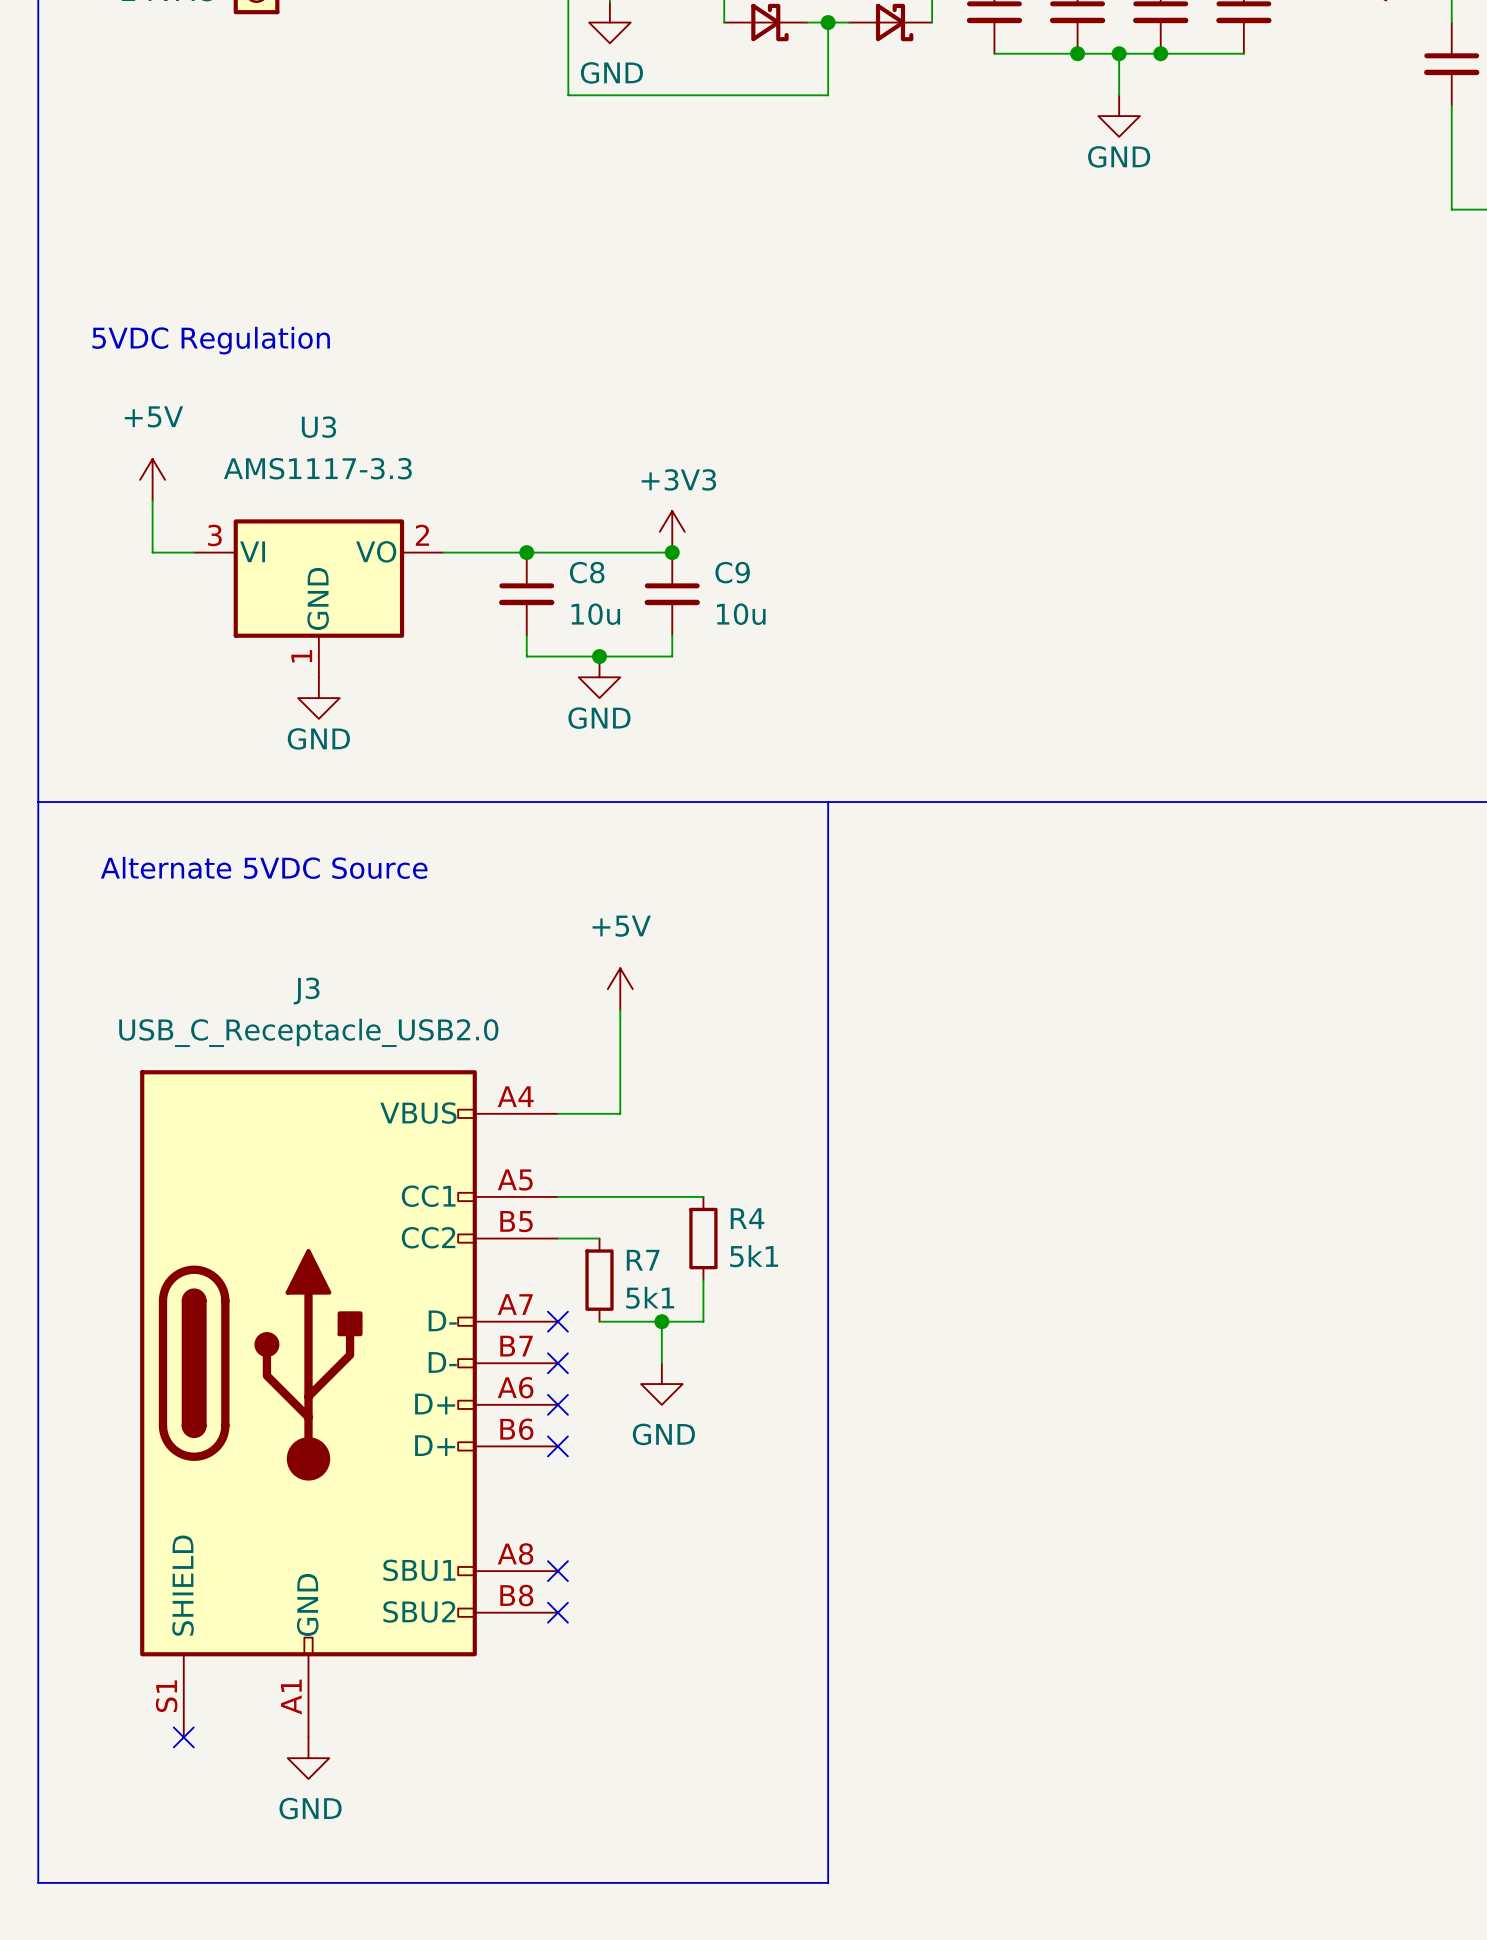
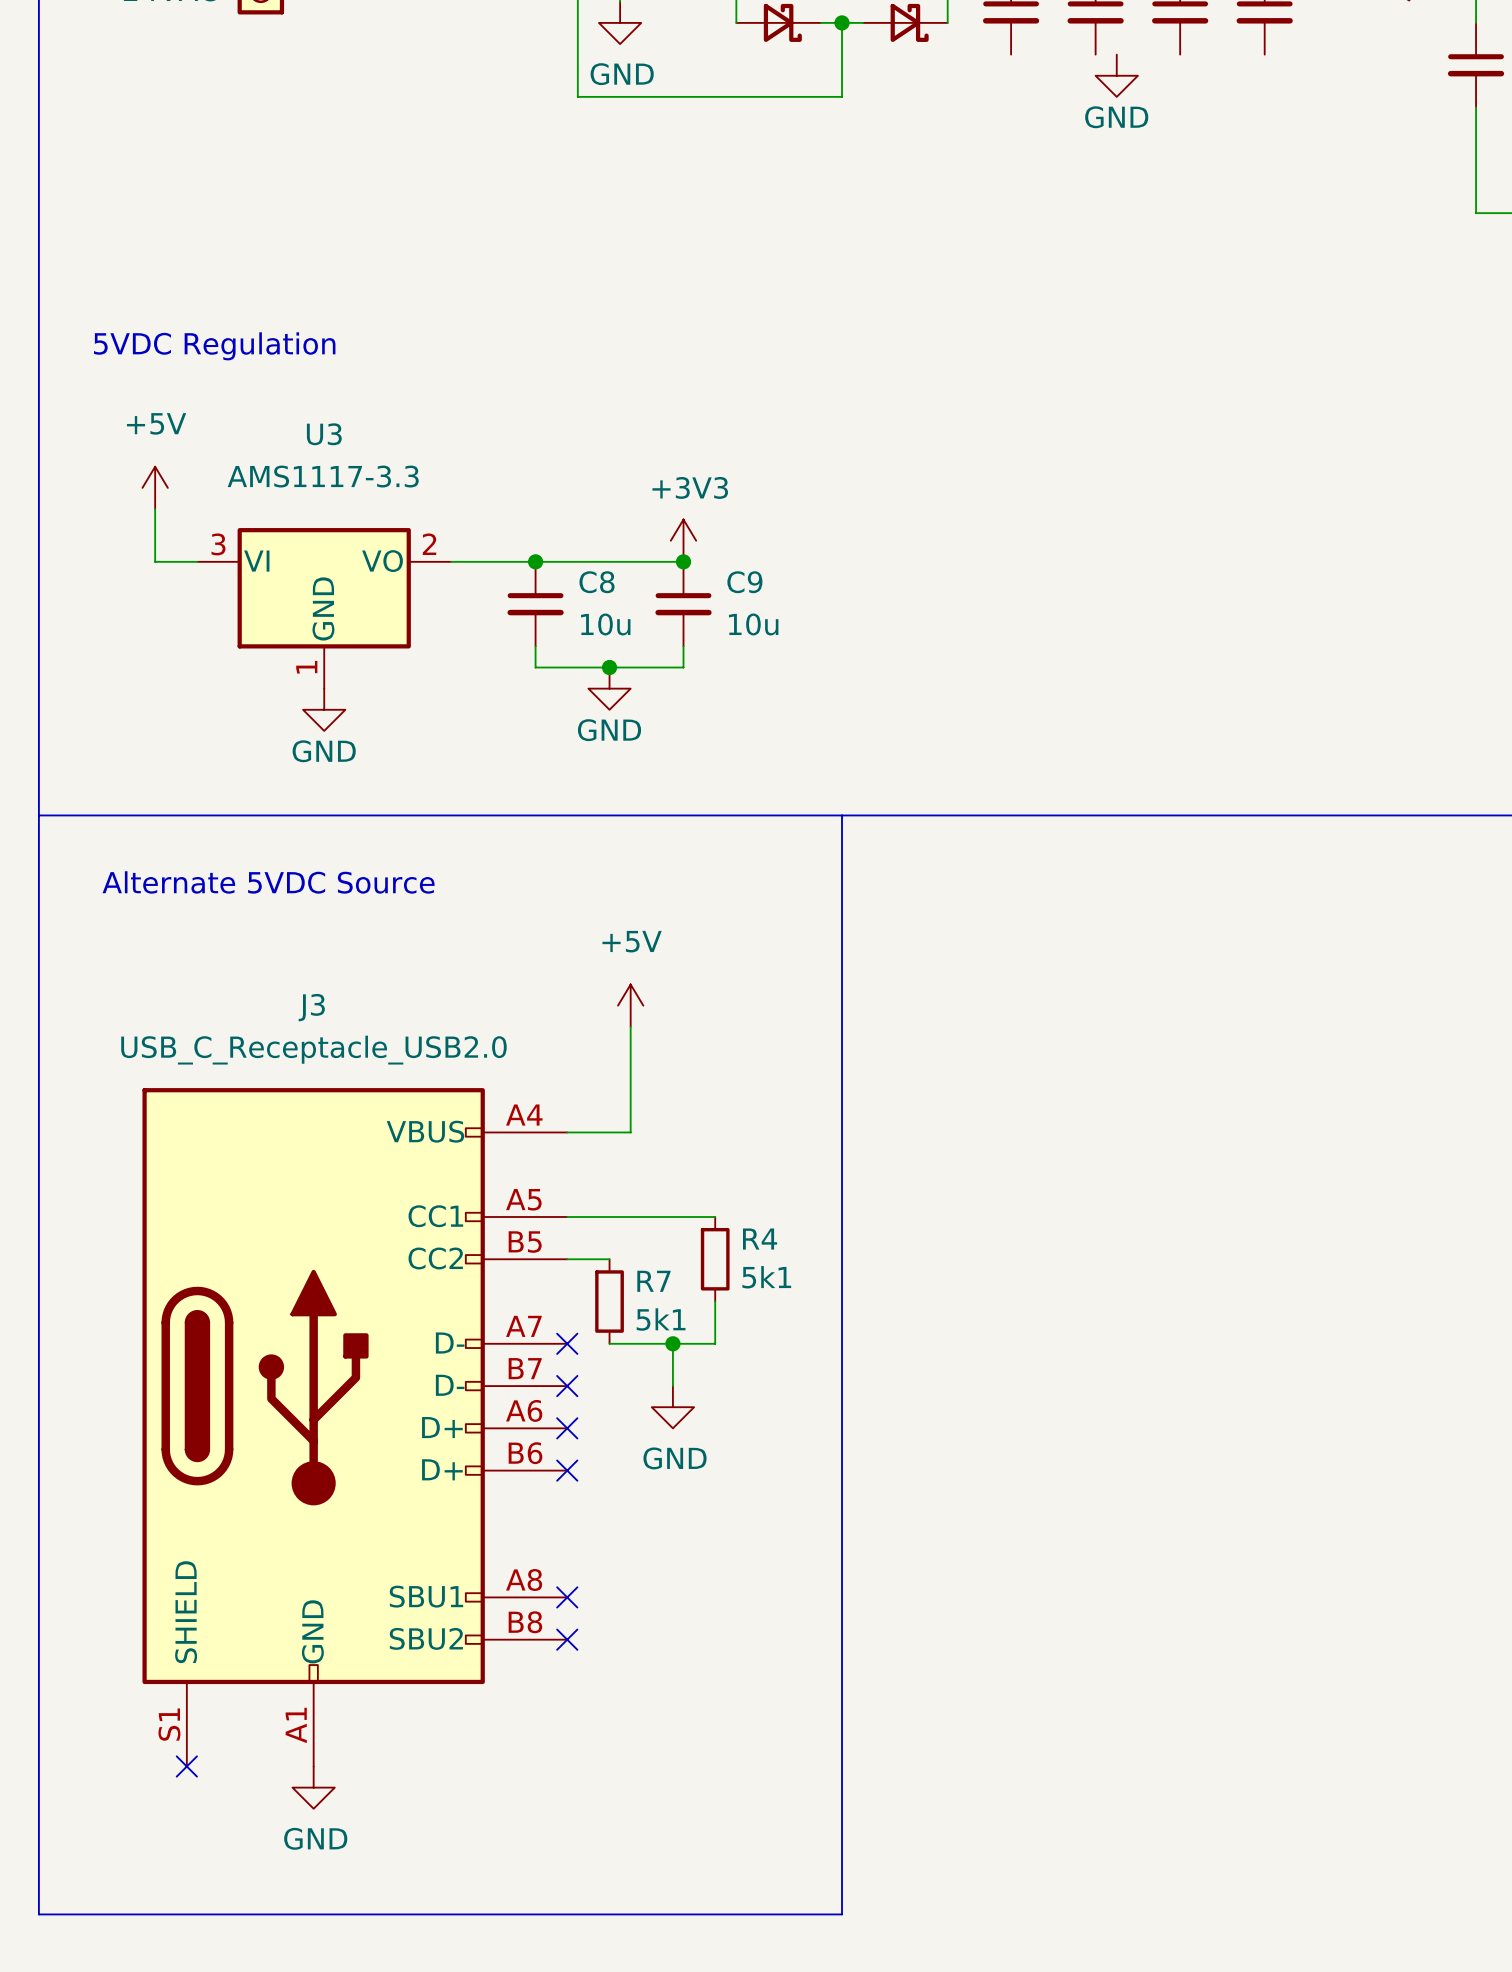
wire: (994, 53) (1243, 53) -> none
junction: (1077, 53) -> none
wire: (1119, 53) (1119, 95) -> none
junction: (1119, 53) -> none
junction: (1160, 53) -> none
power symbol position: GND (1119, 116) -> GND (1116, 75)

